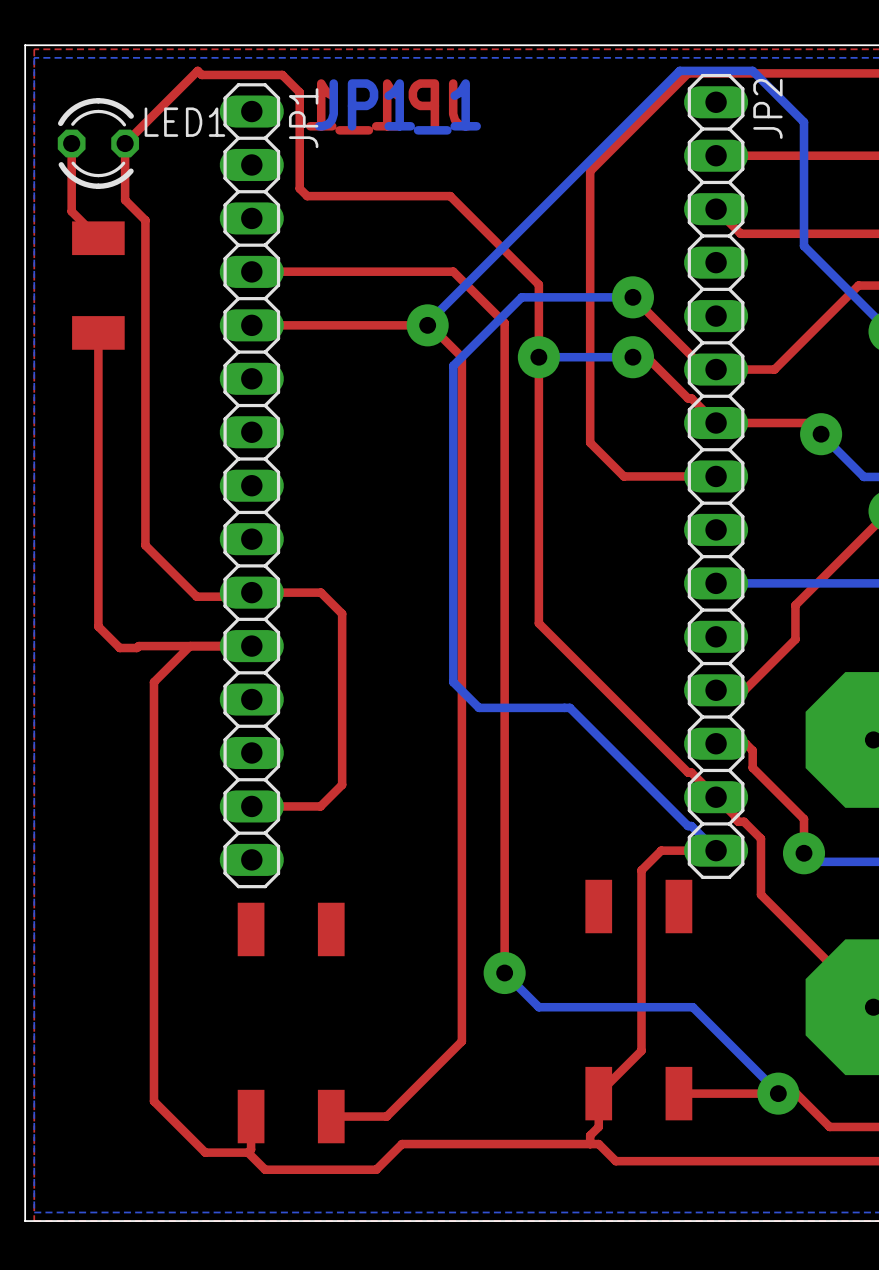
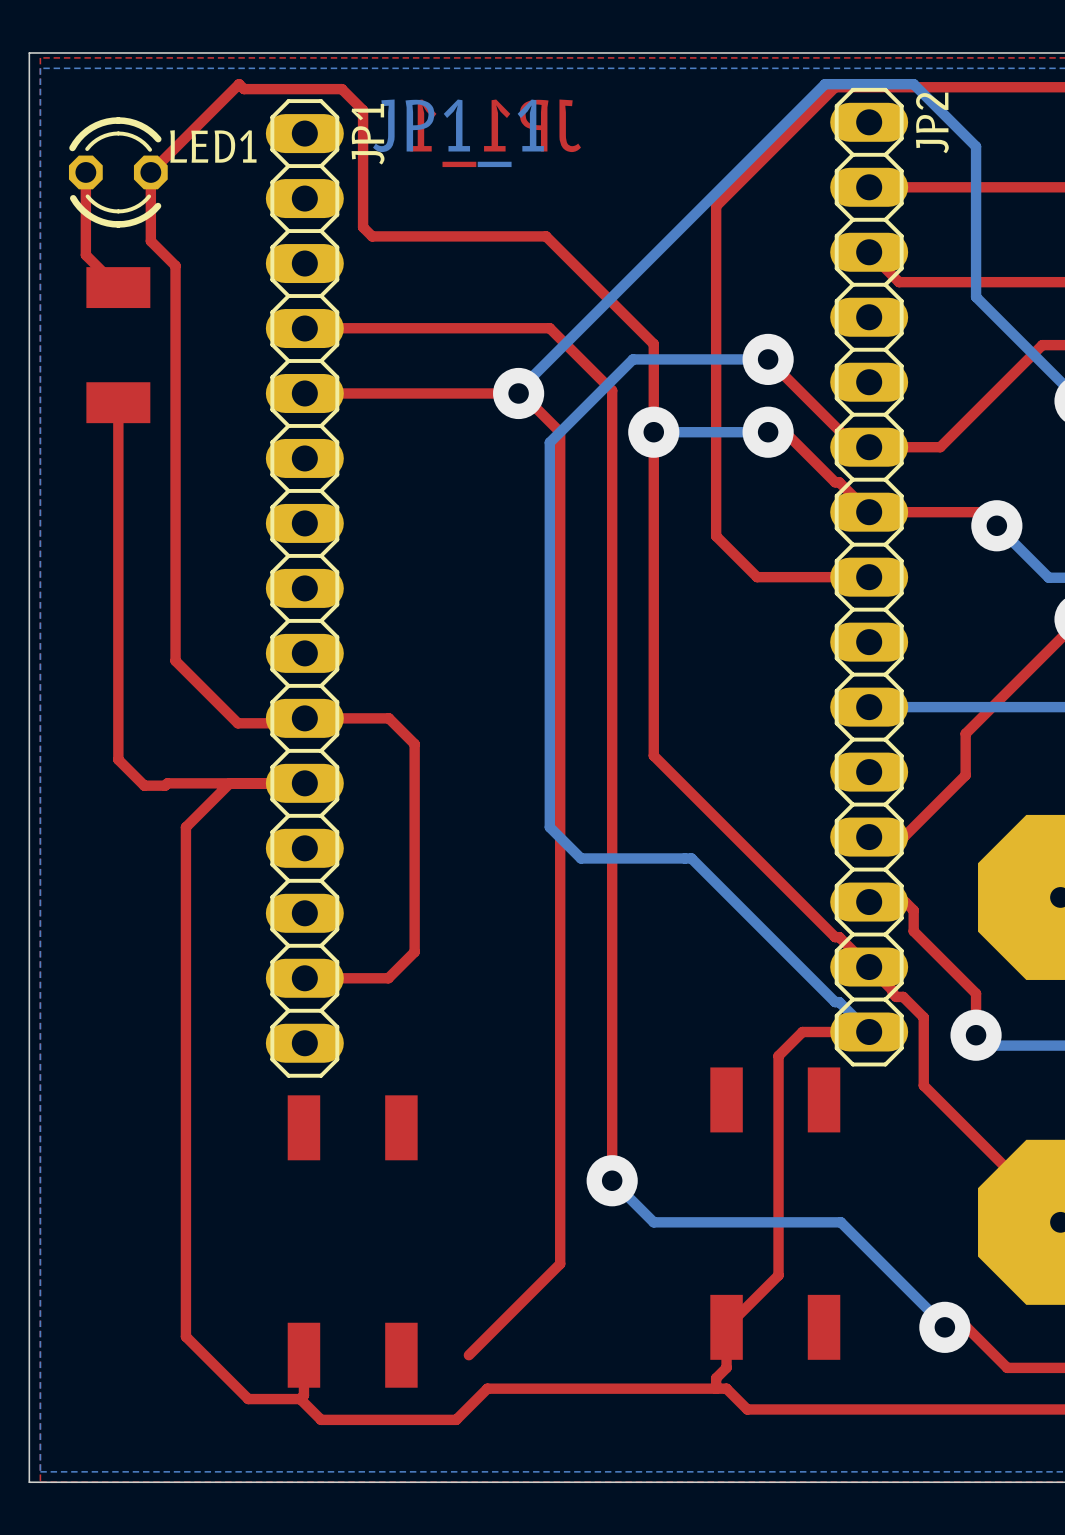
top track: (778, 1093) (678, 1093) -> none
top track: (386, 1116) (331, 1116) -> none

